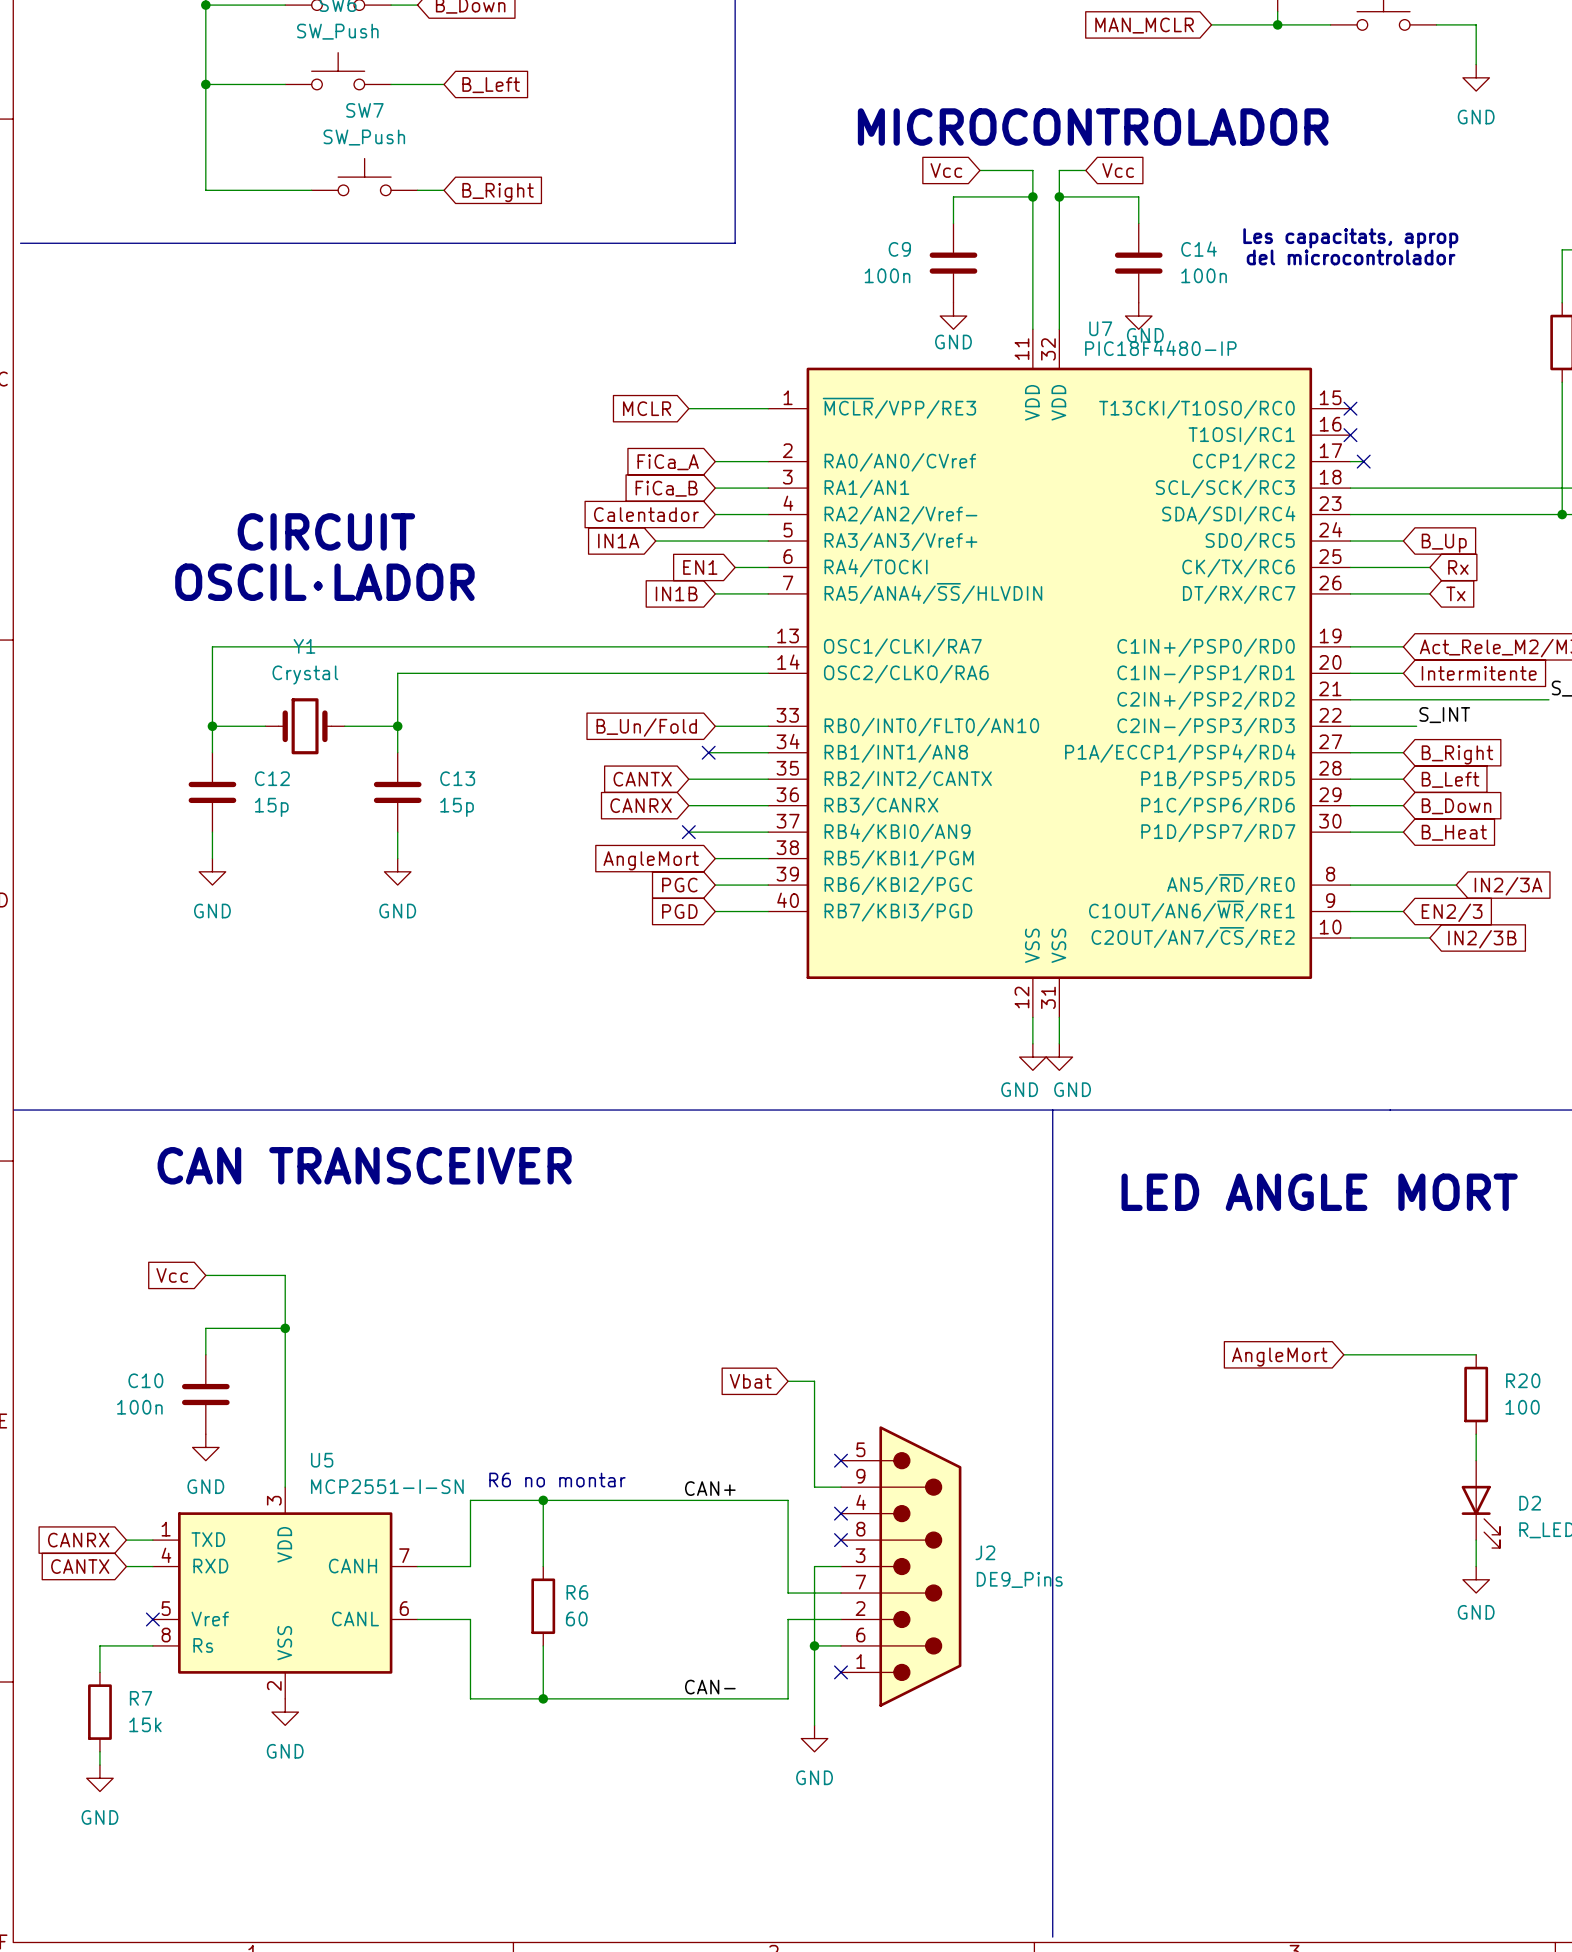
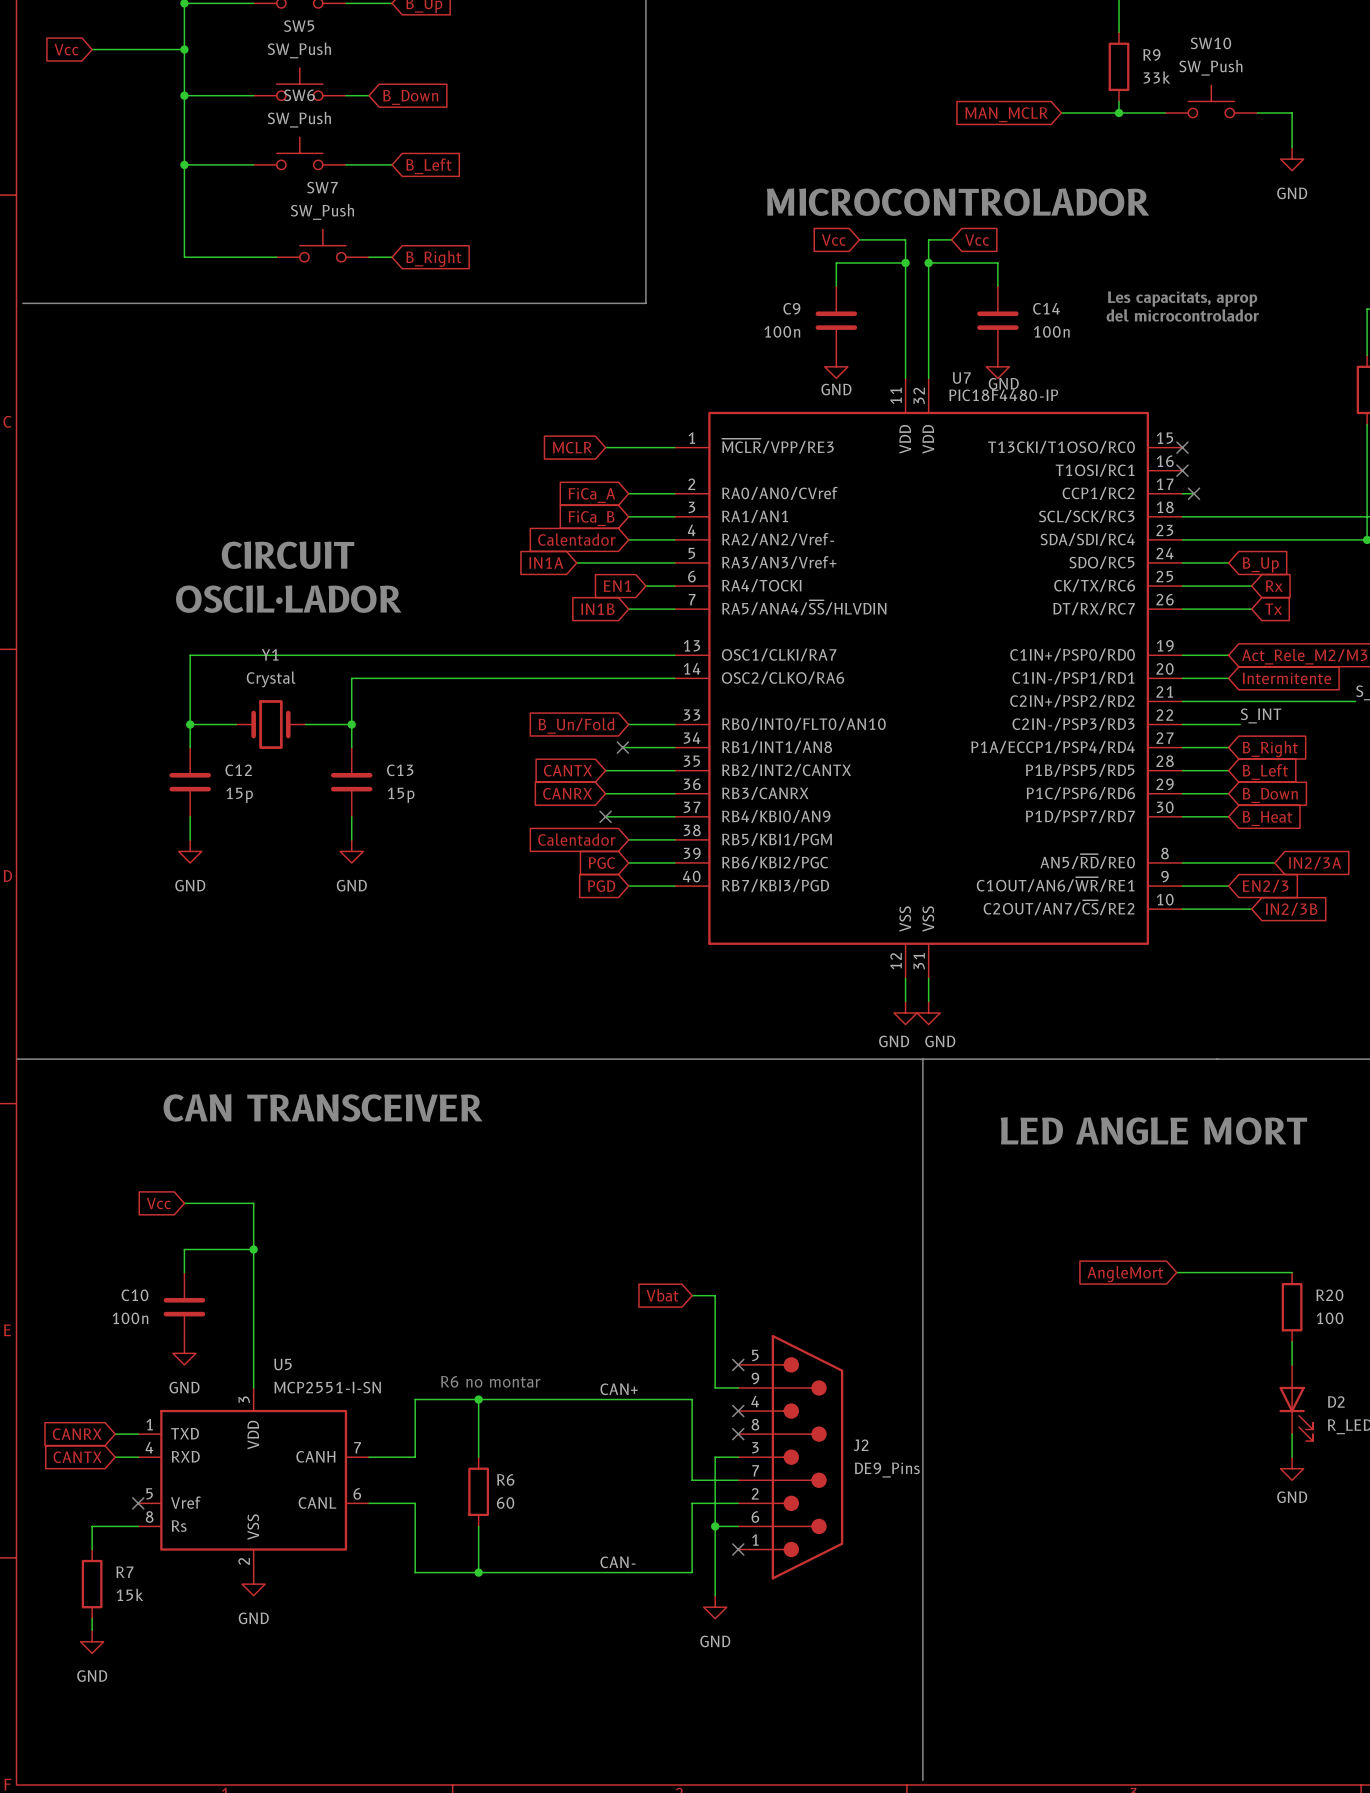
global label: AngleMort (651, 860) -> Calentador (576, 839)

